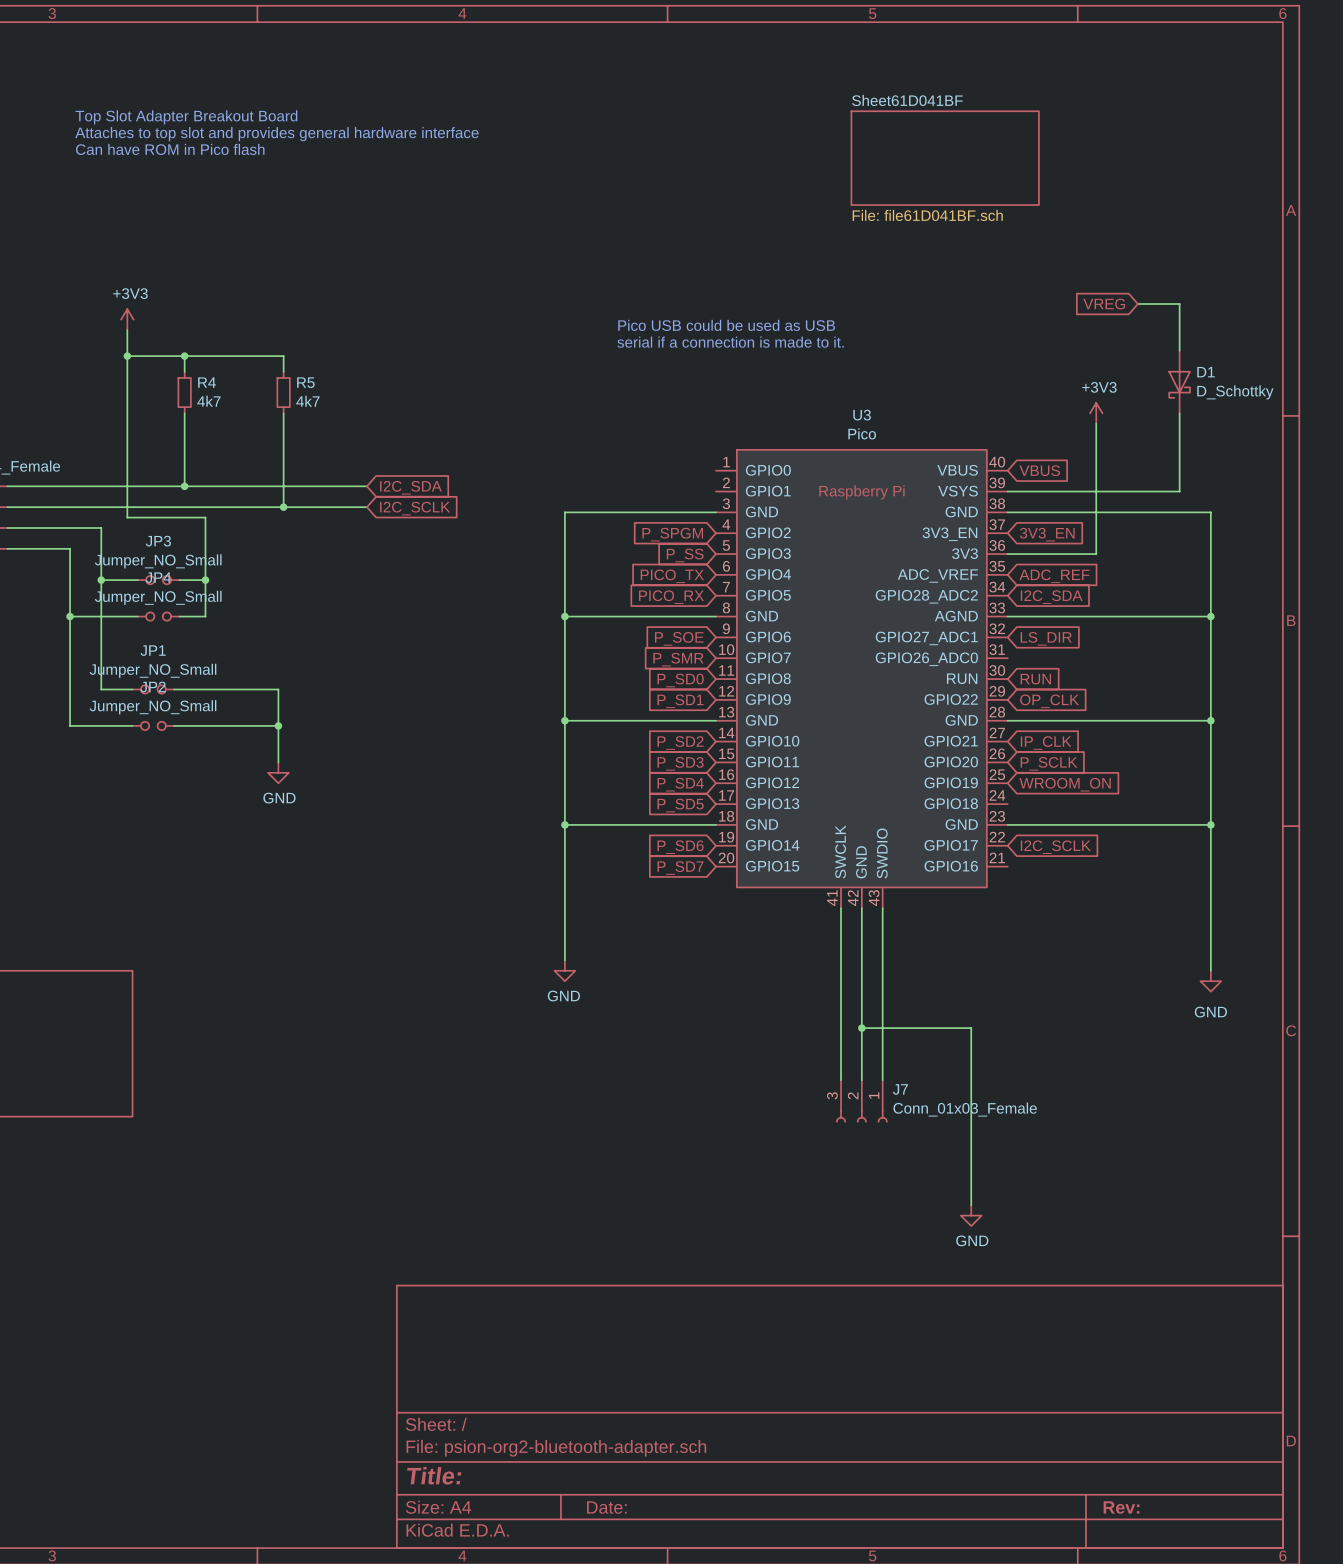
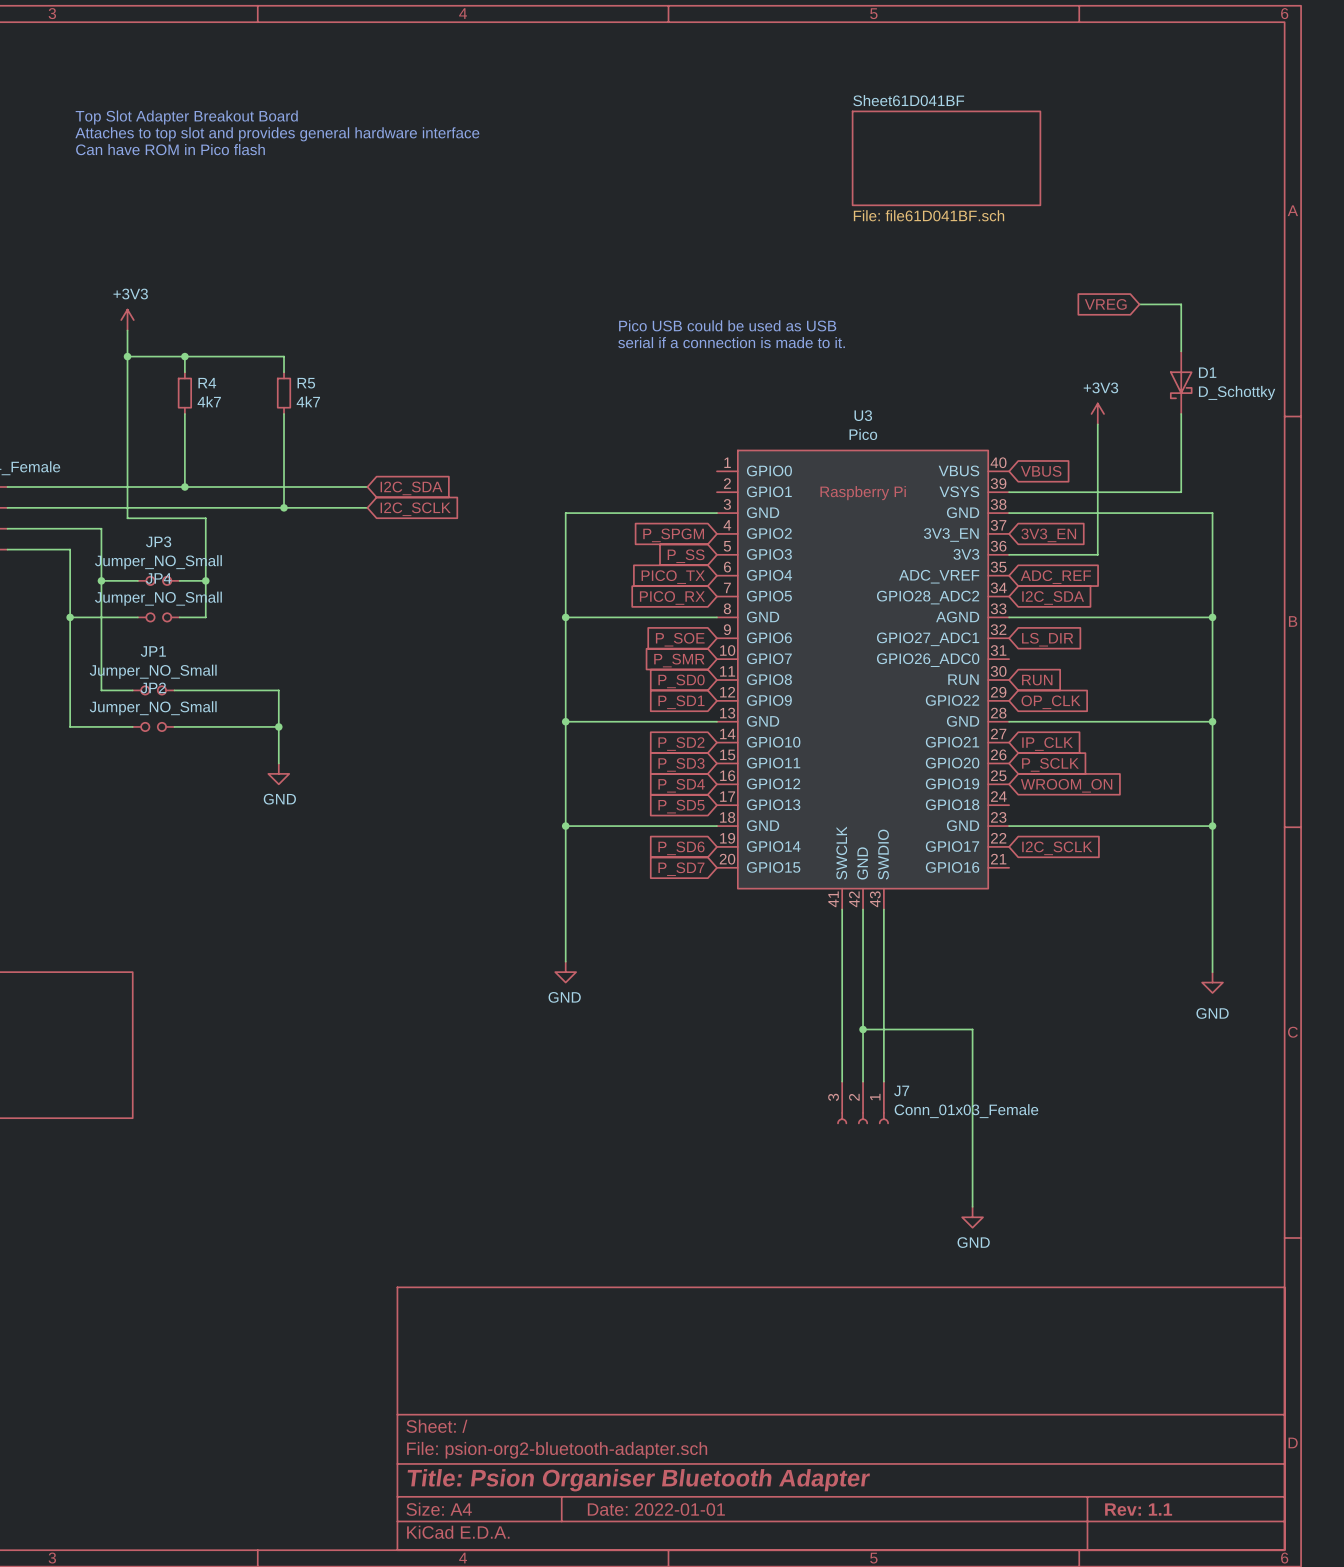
title block: Title: (434, 1475) -> Title: Psion Organiser Bluetooth Adapter (638, 1480)
title block: Date: (606, 1507) -> Date: 2022-01-01 (656, 1509)
title block: Rev: (1121, 1507) -> Rev: 1.1 (1138, 1509)

